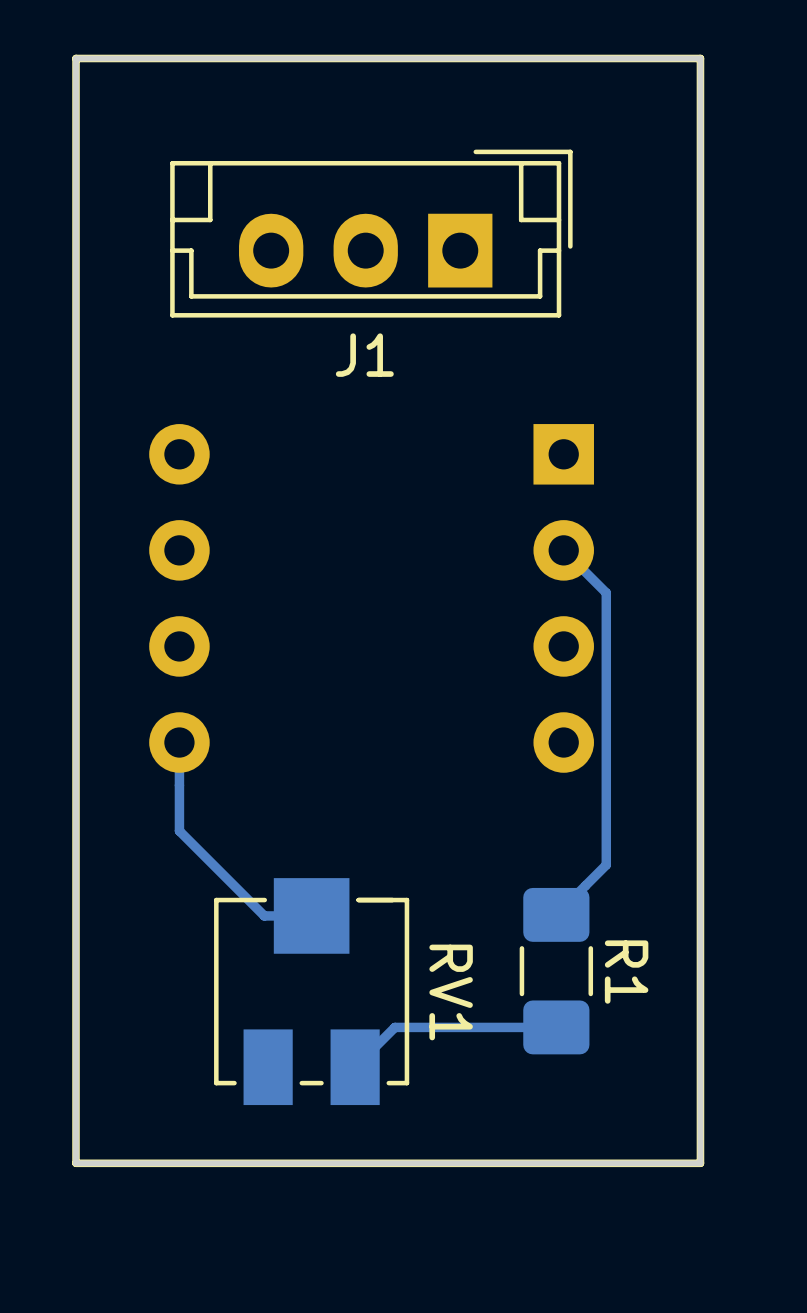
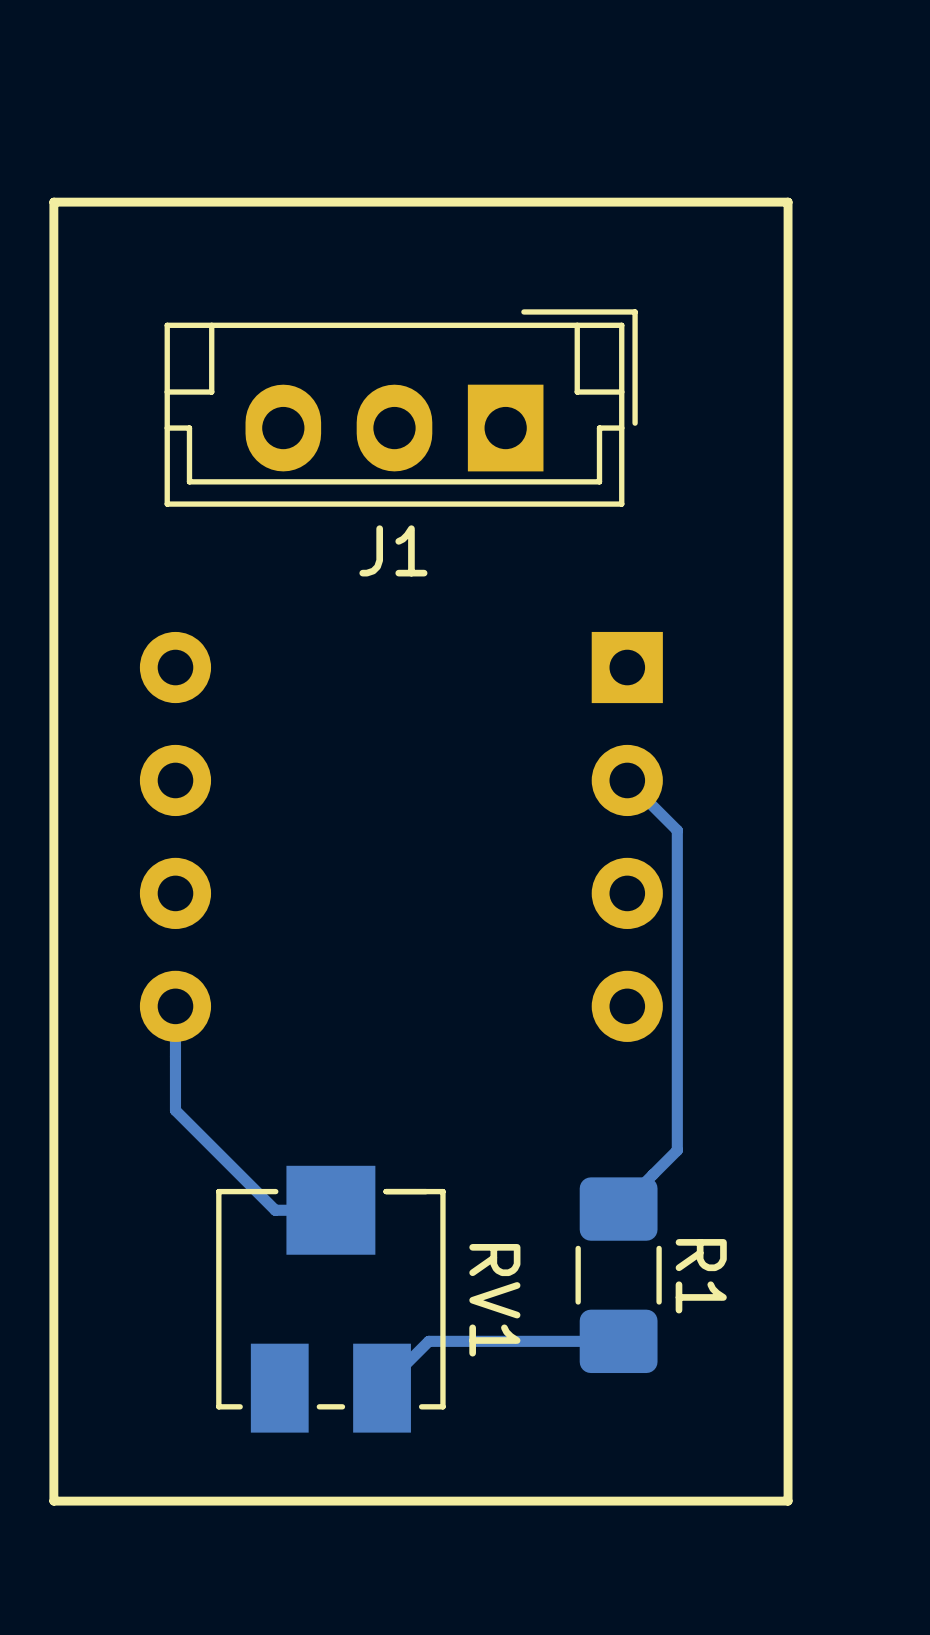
board edge: (700, 58) (76, 58) (76, 1163) (700, 1163) (700, 58) -> none

